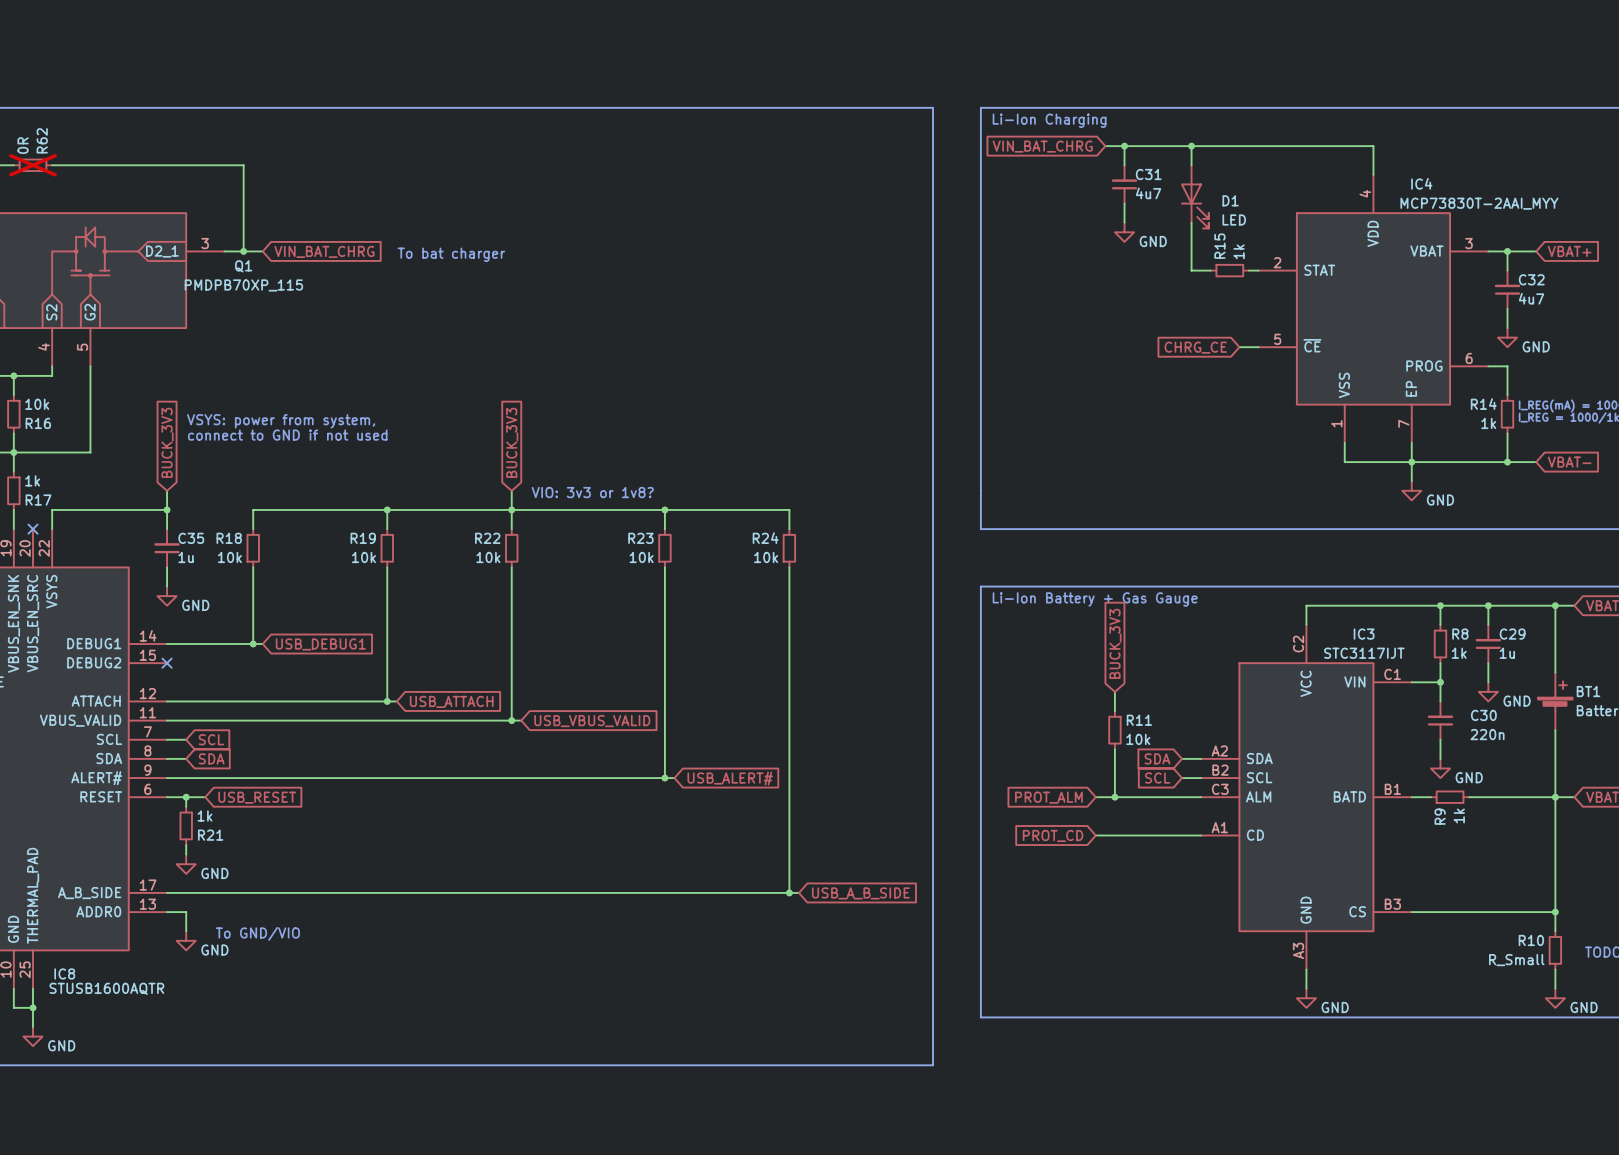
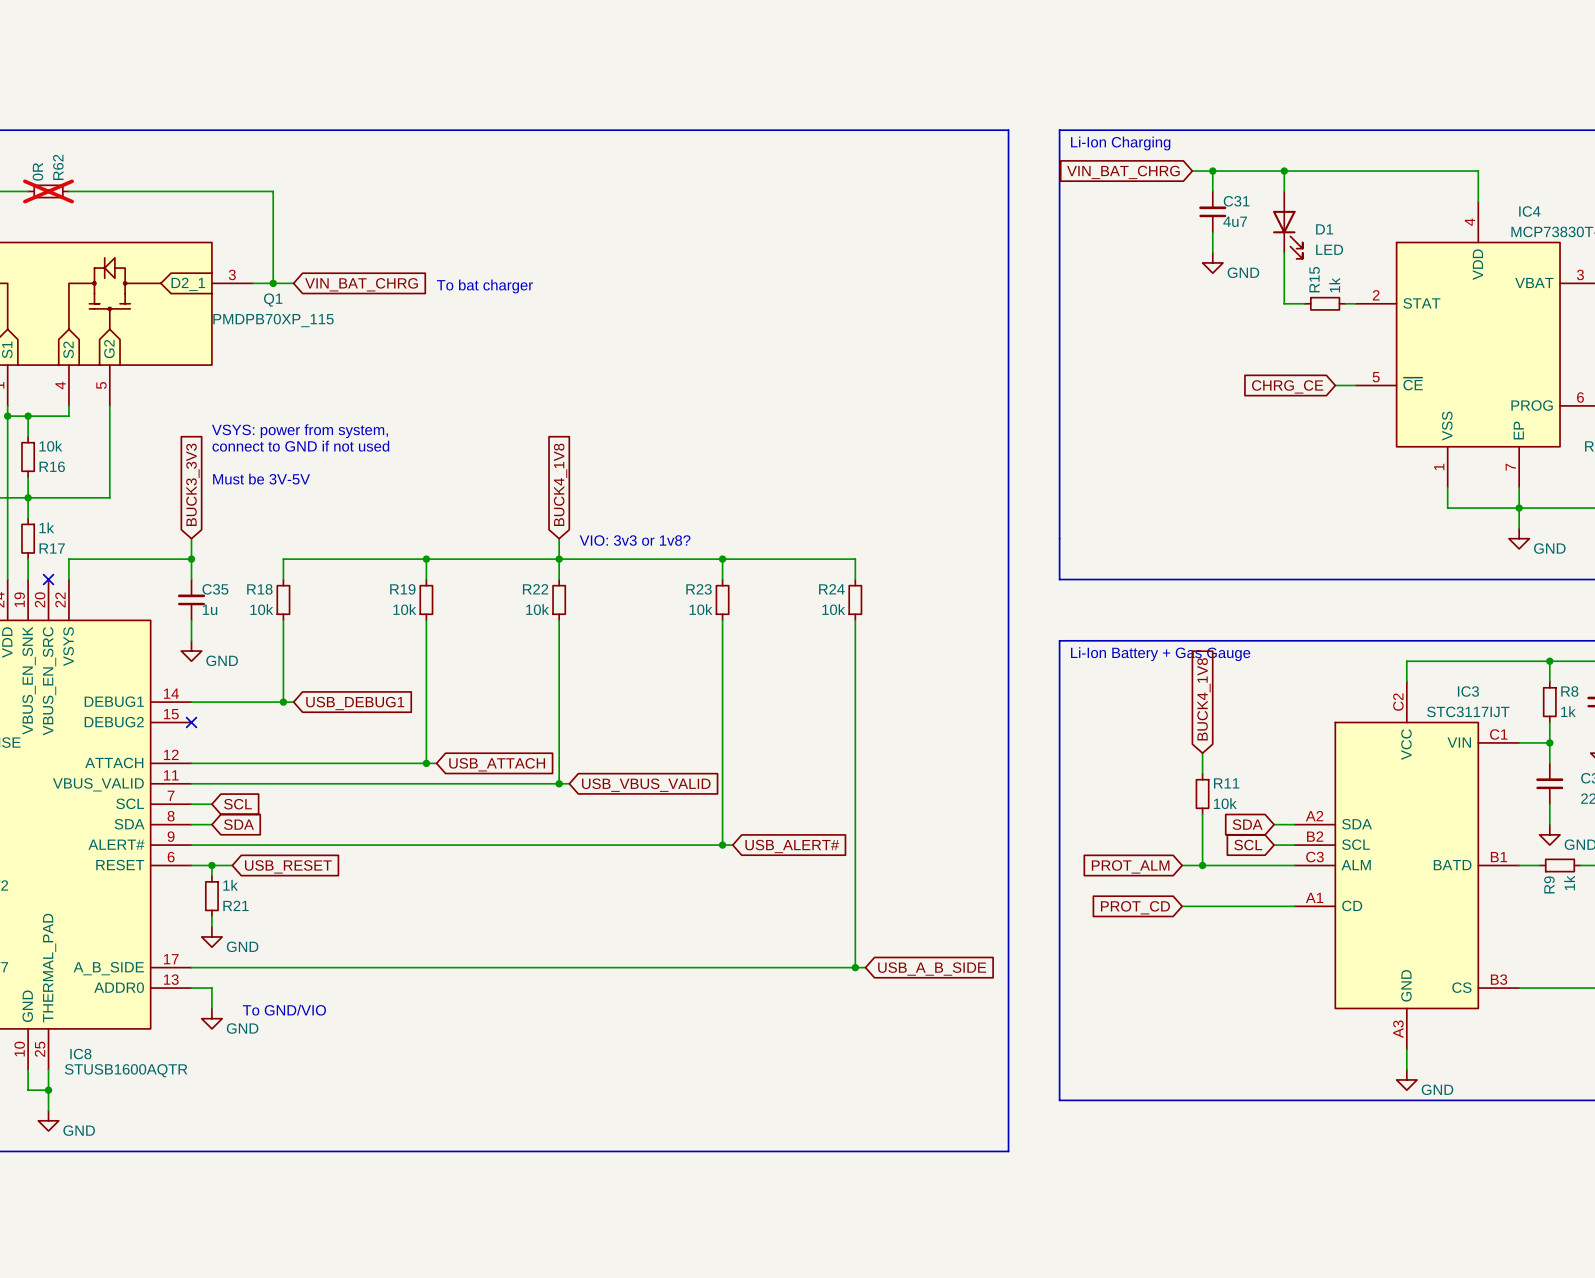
text: none -> connect to GND if not used (300, 446)
text position: VSYS: power from system, (281, 421) -> VSYS: power from system, (299, 431)
text: connect to GND if not used (287, 435) -> Must be 3V-5V (261, 479)
global label: BUCK_3V3 (167, 442) -> BUCK3_3V3 (192, 484)
global label: BUCK_3V3 (512, 442) -> BUCK4_1V8 (560, 484)
global label: BUCK_3V3 (1115, 643) -> BUCK4_1V8 (1203, 699)

